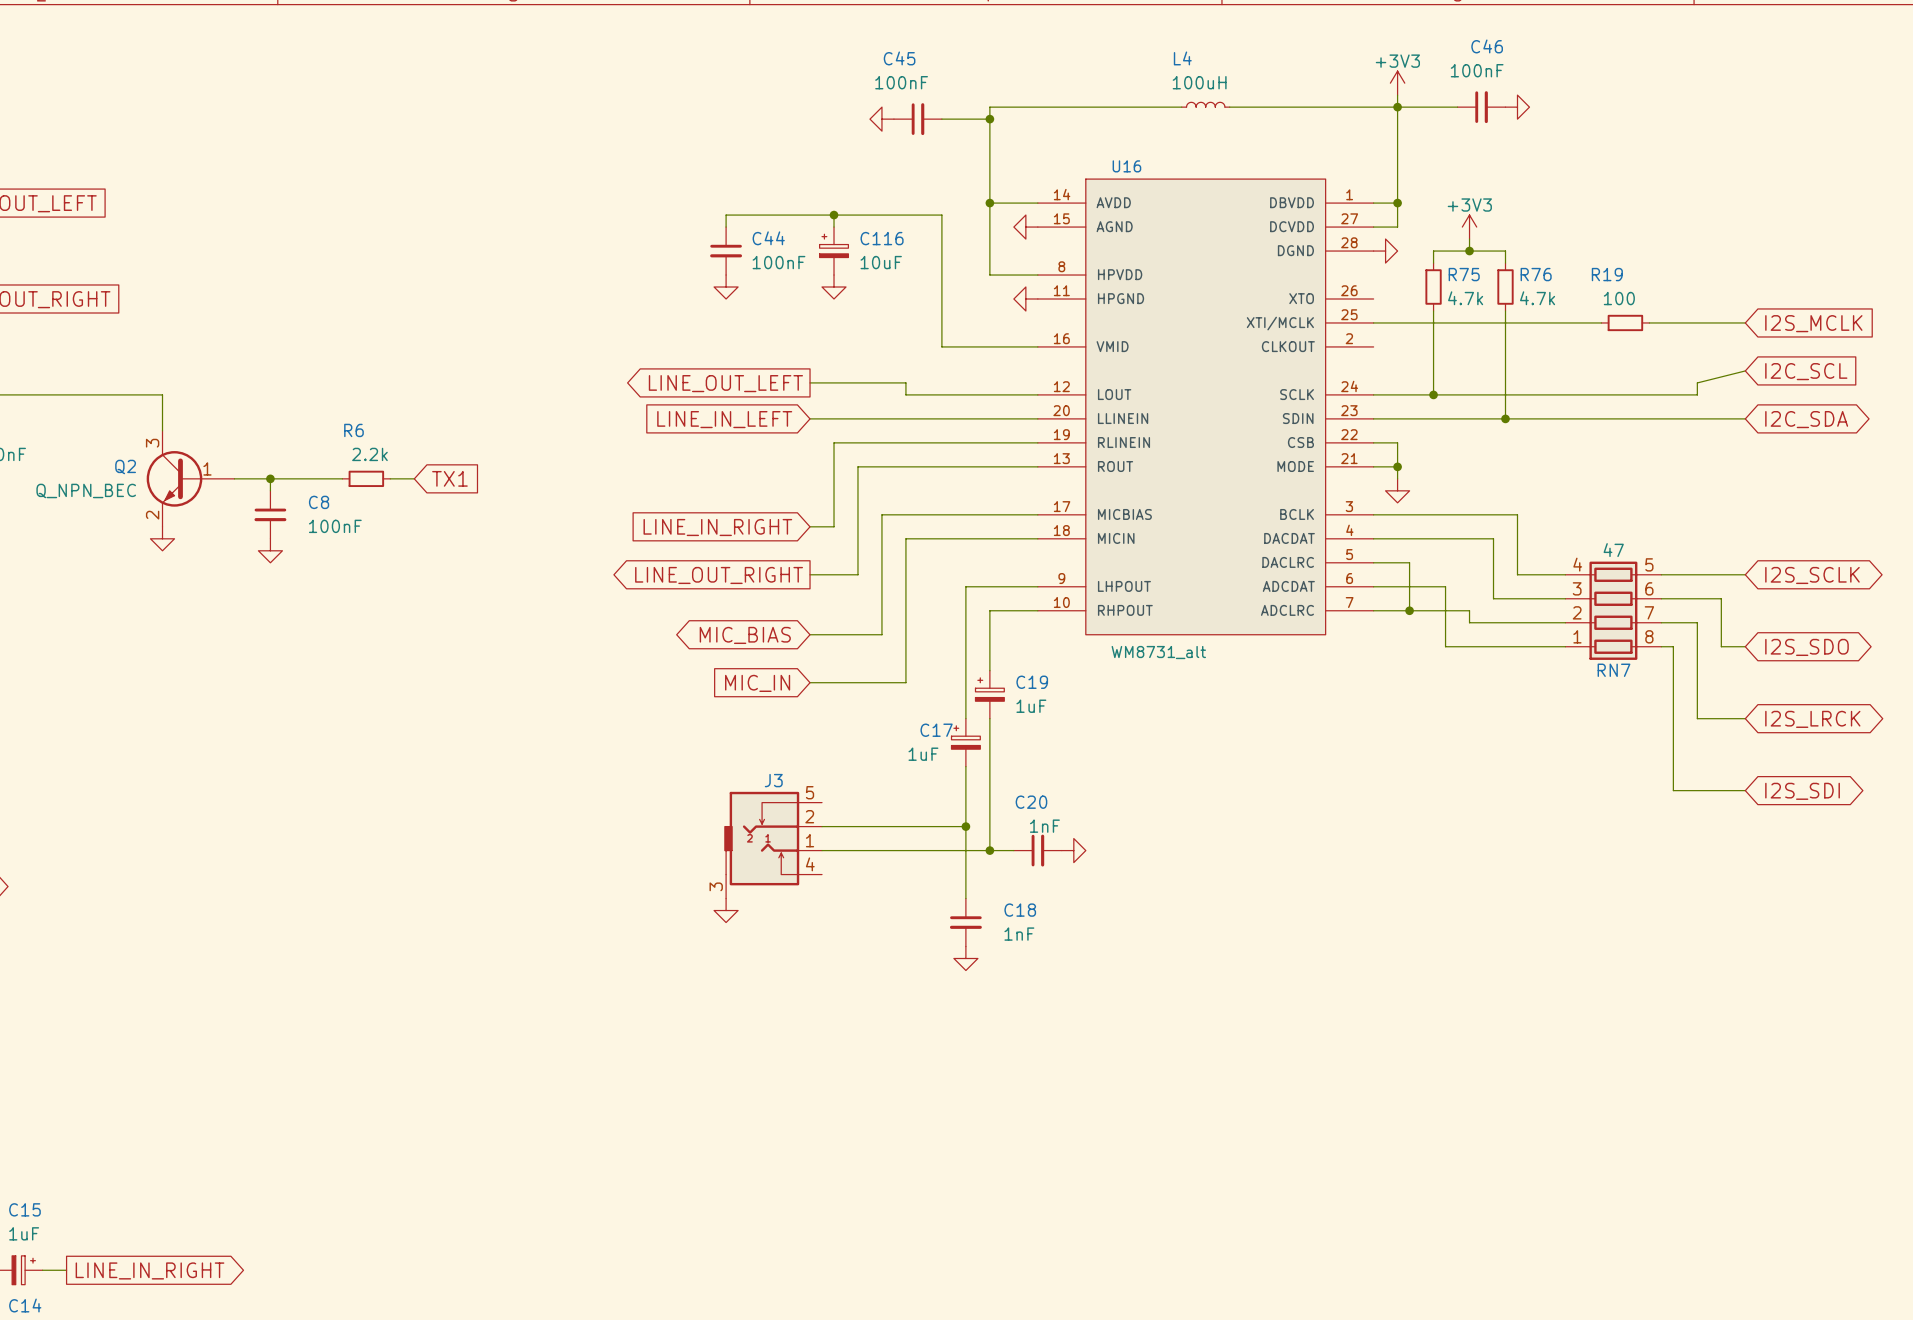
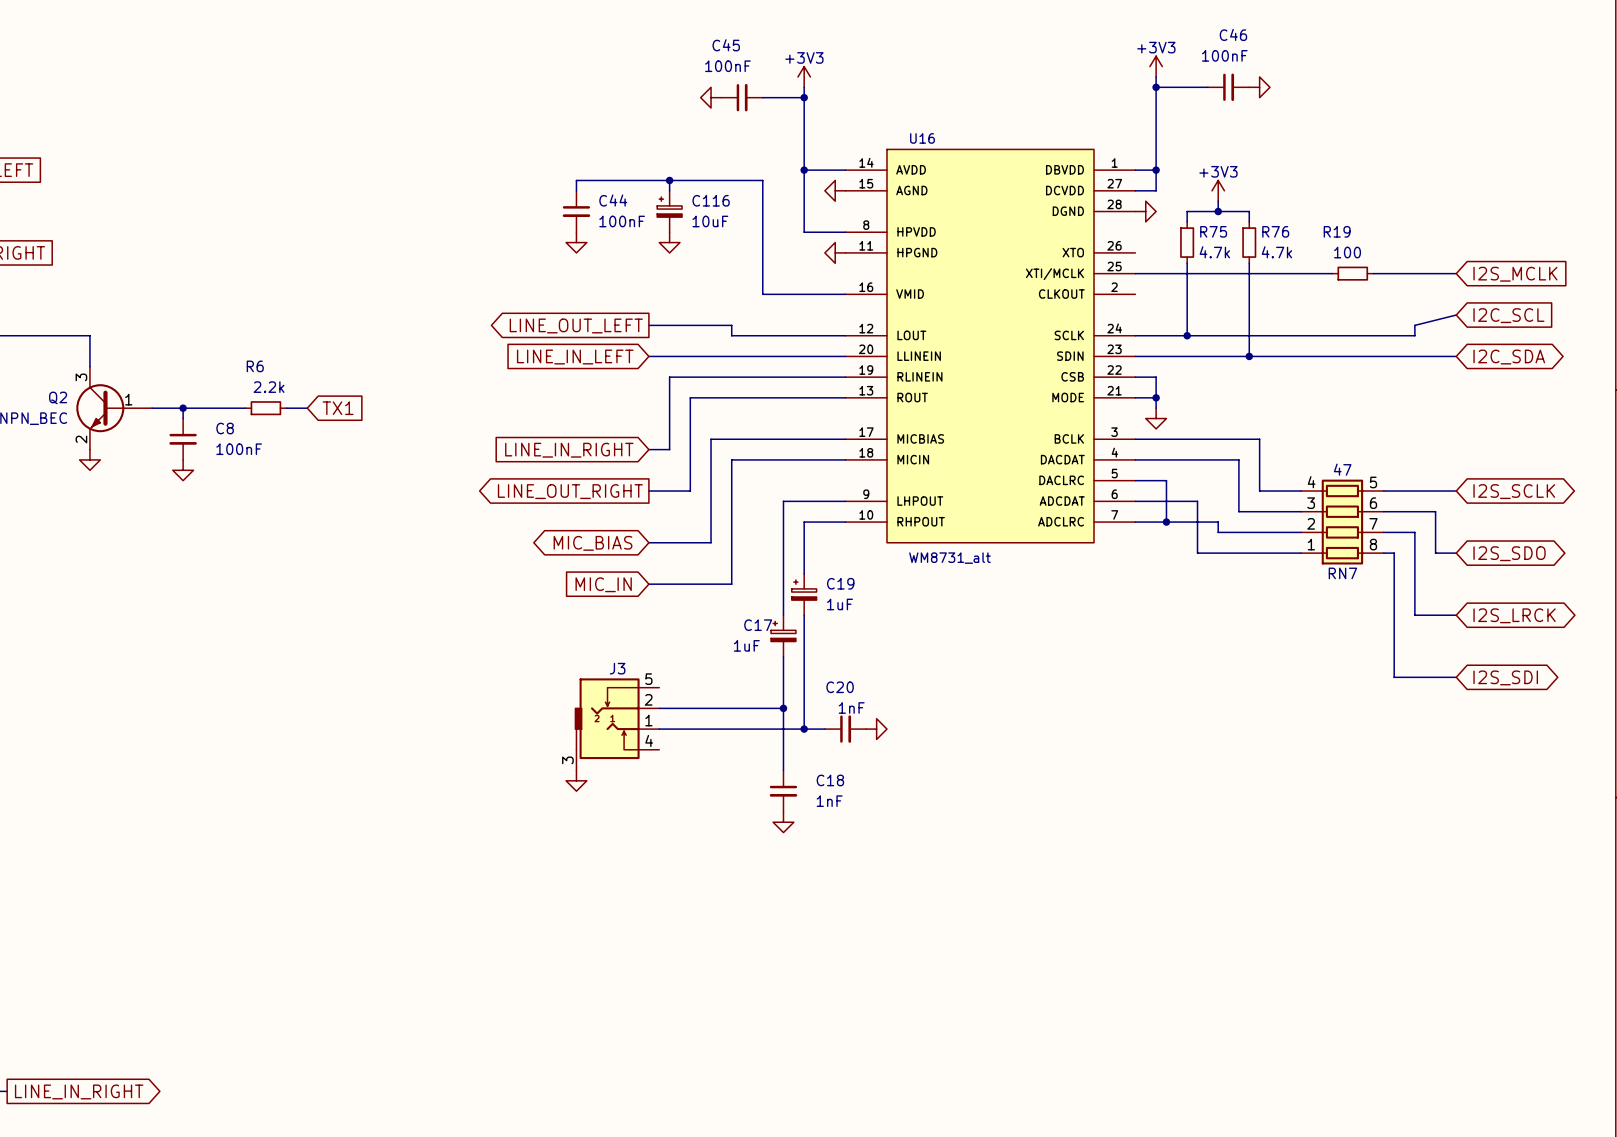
power symbol: none -> +3V3 (804, 76)
L4: 100uH (1205, 104) -> none
wire: (989, 107) (1181, 107) -> none
wire: (1229, 107) (1397, 107) -> none

